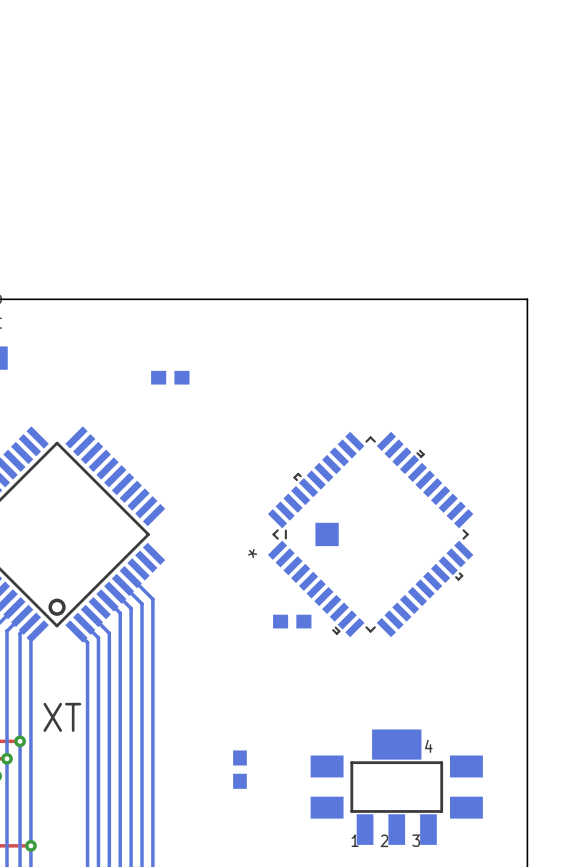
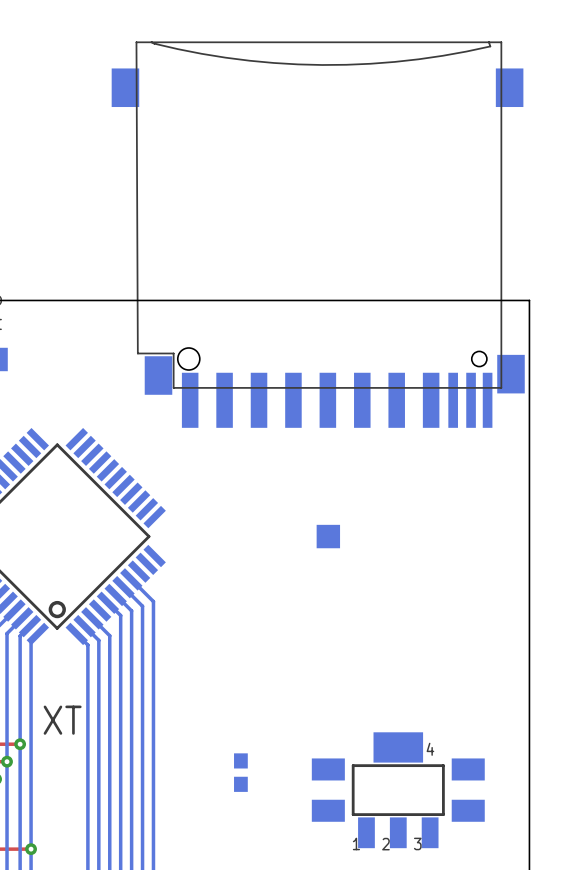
part: none -> (318, 234)
part: (170, 377) -> none
part: (370, 534) -> none
part: (292, 621) -> none

